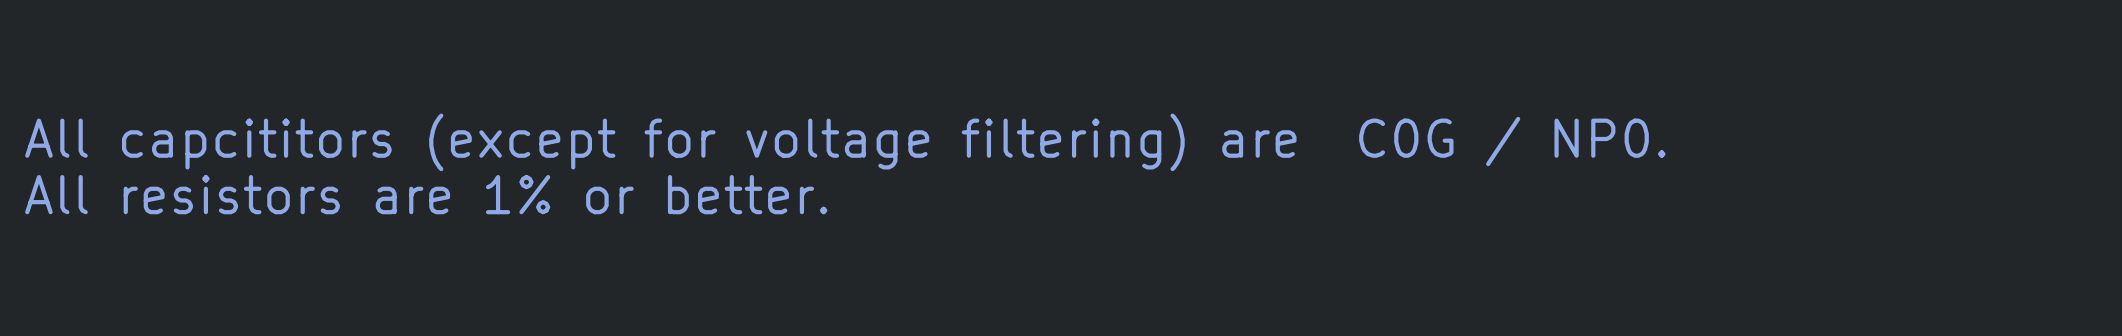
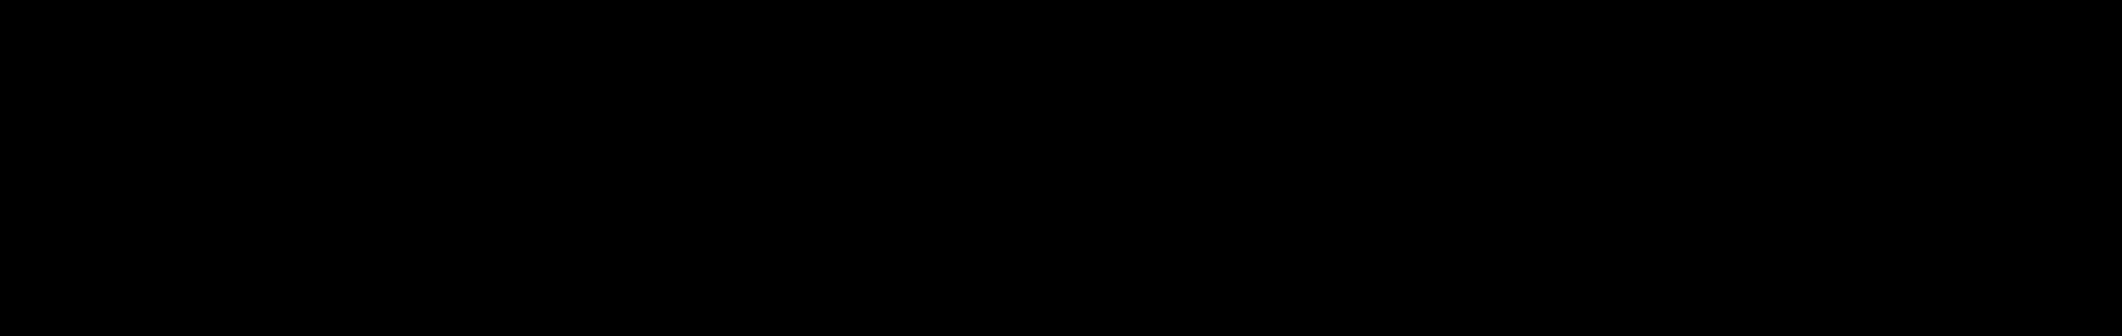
text: All capcititors (except for voltage filtering) are C0G / NP0. (845, 142) -> none
text: All resistors are 1% or better. (426, 194) -> none

